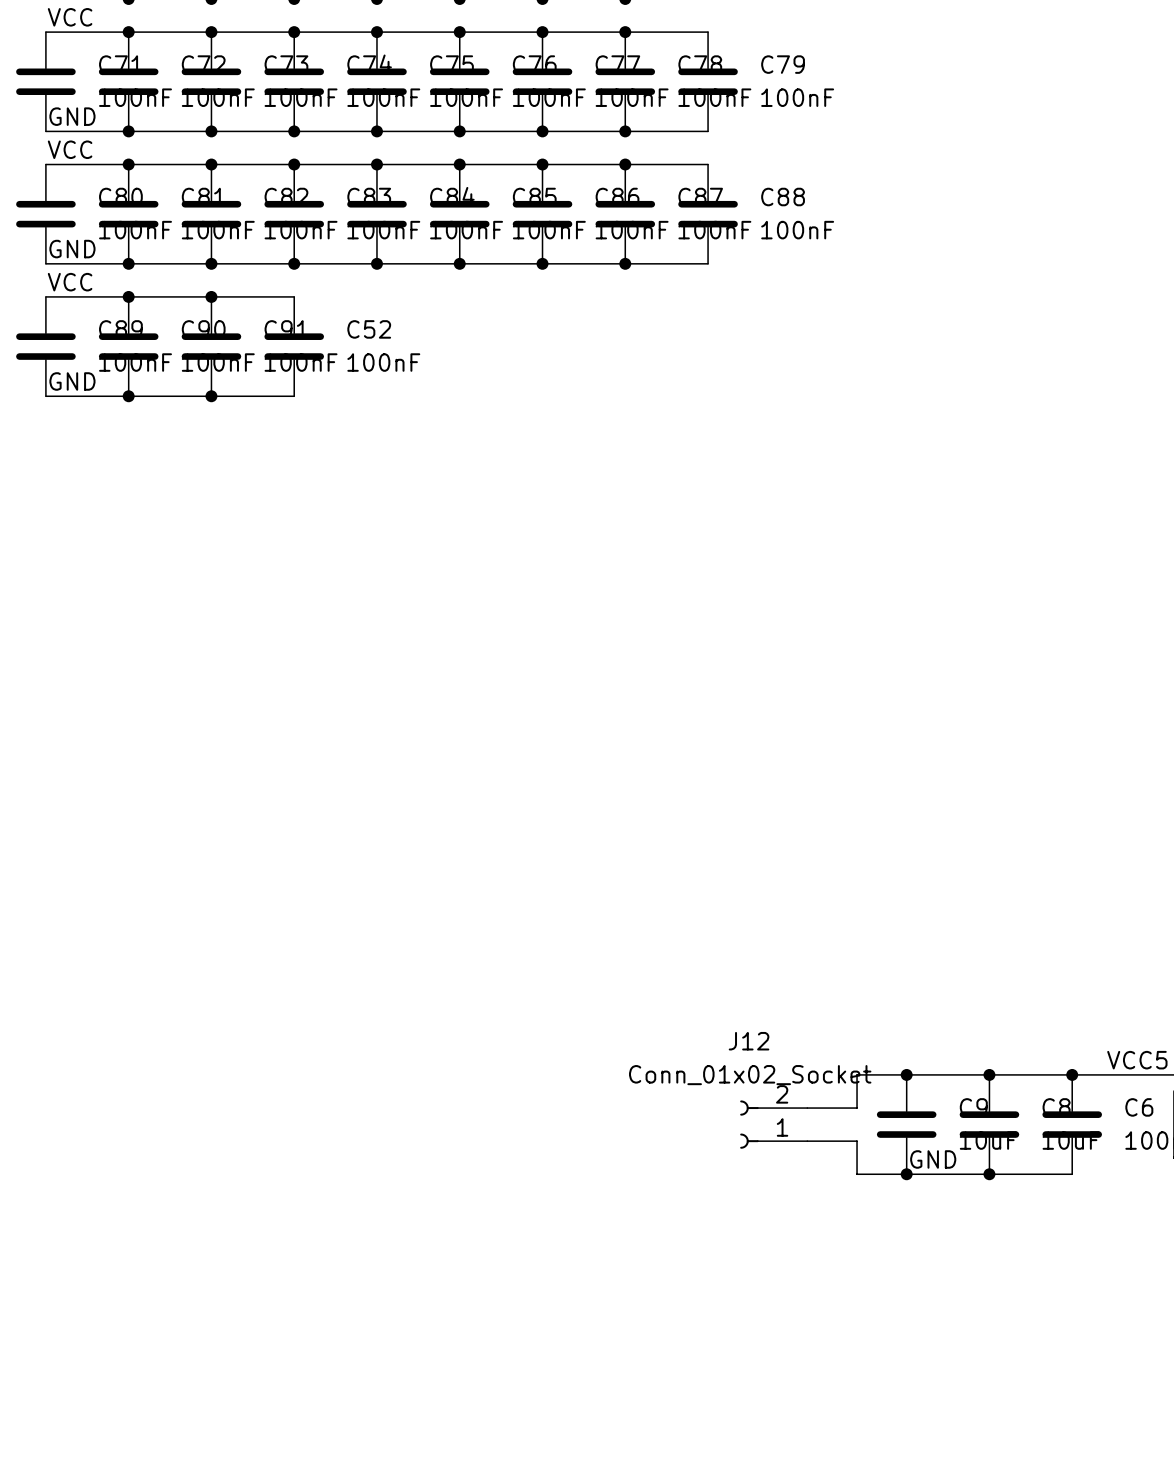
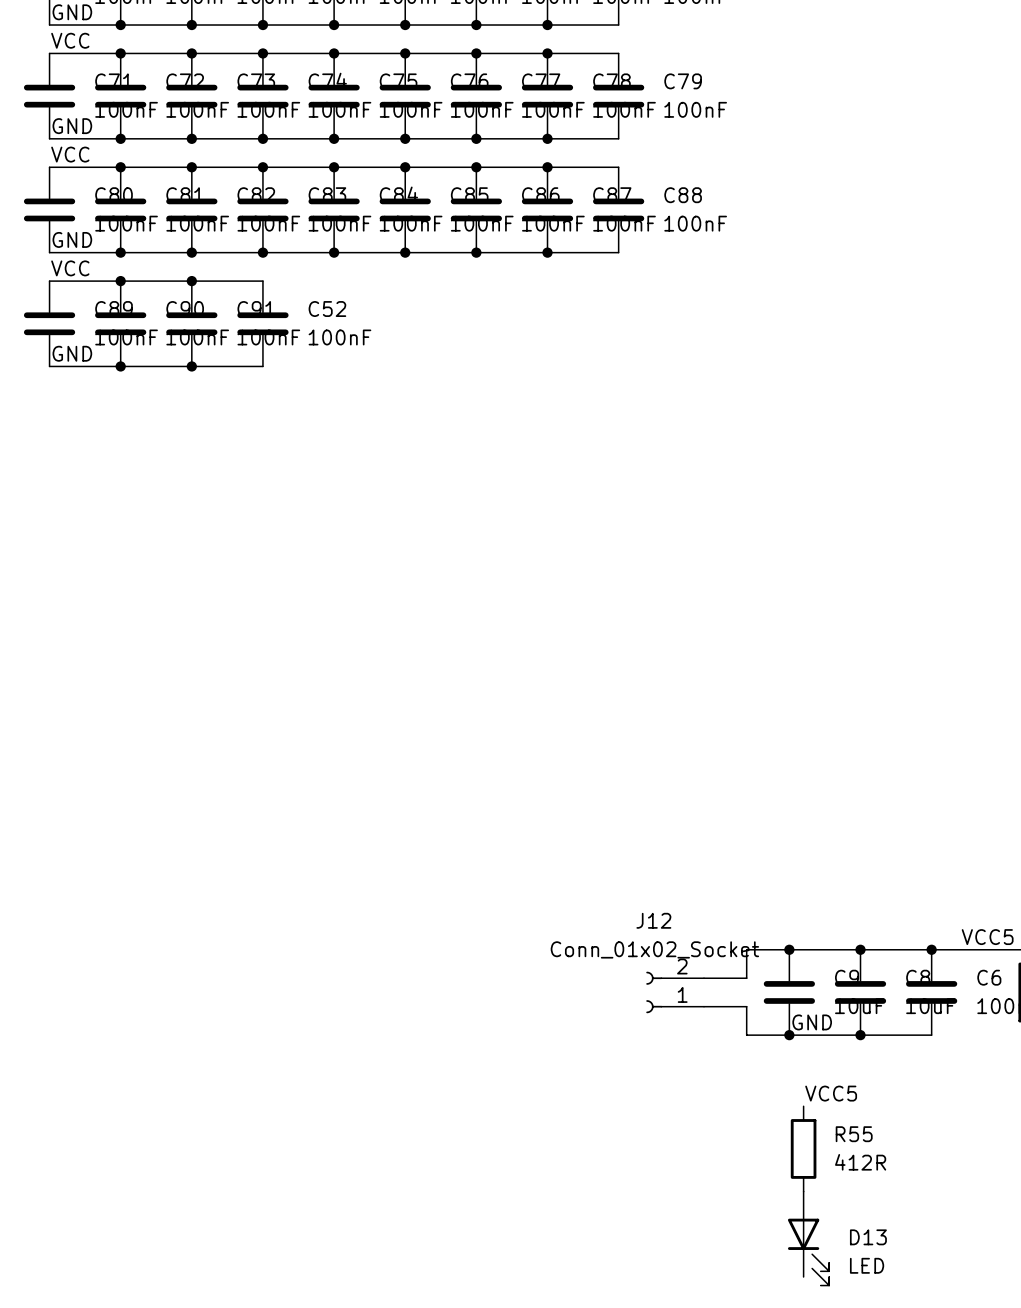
label: none -> VCC5 (831, 1093)
R55: none -> 412R (803, 1148)
D13: none -> LED (808, 1238)

